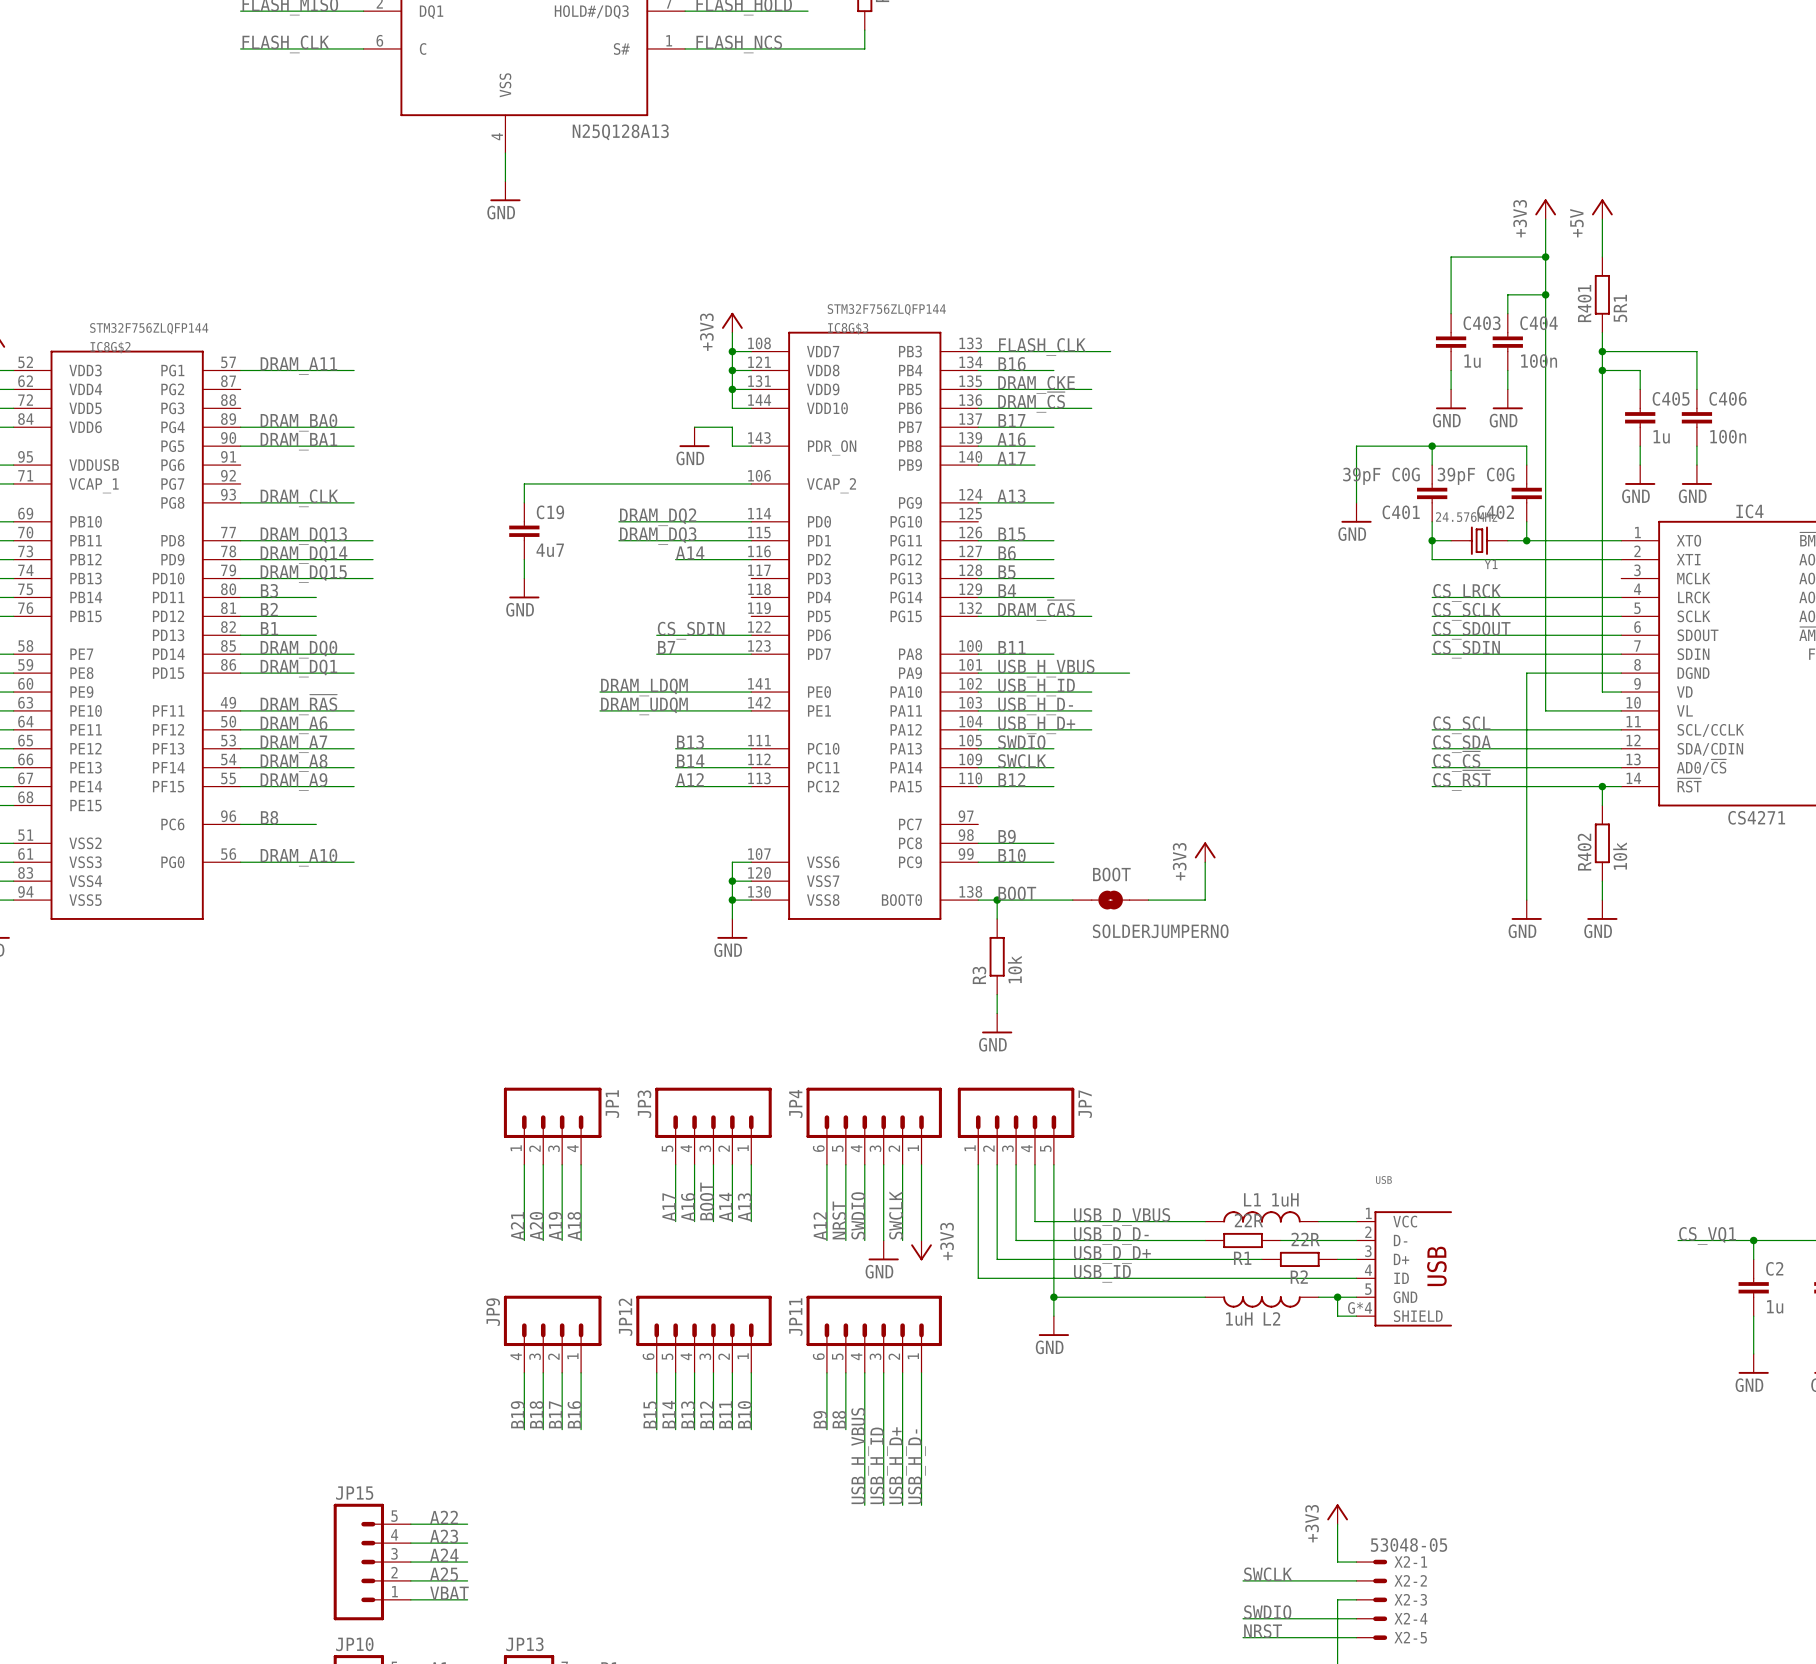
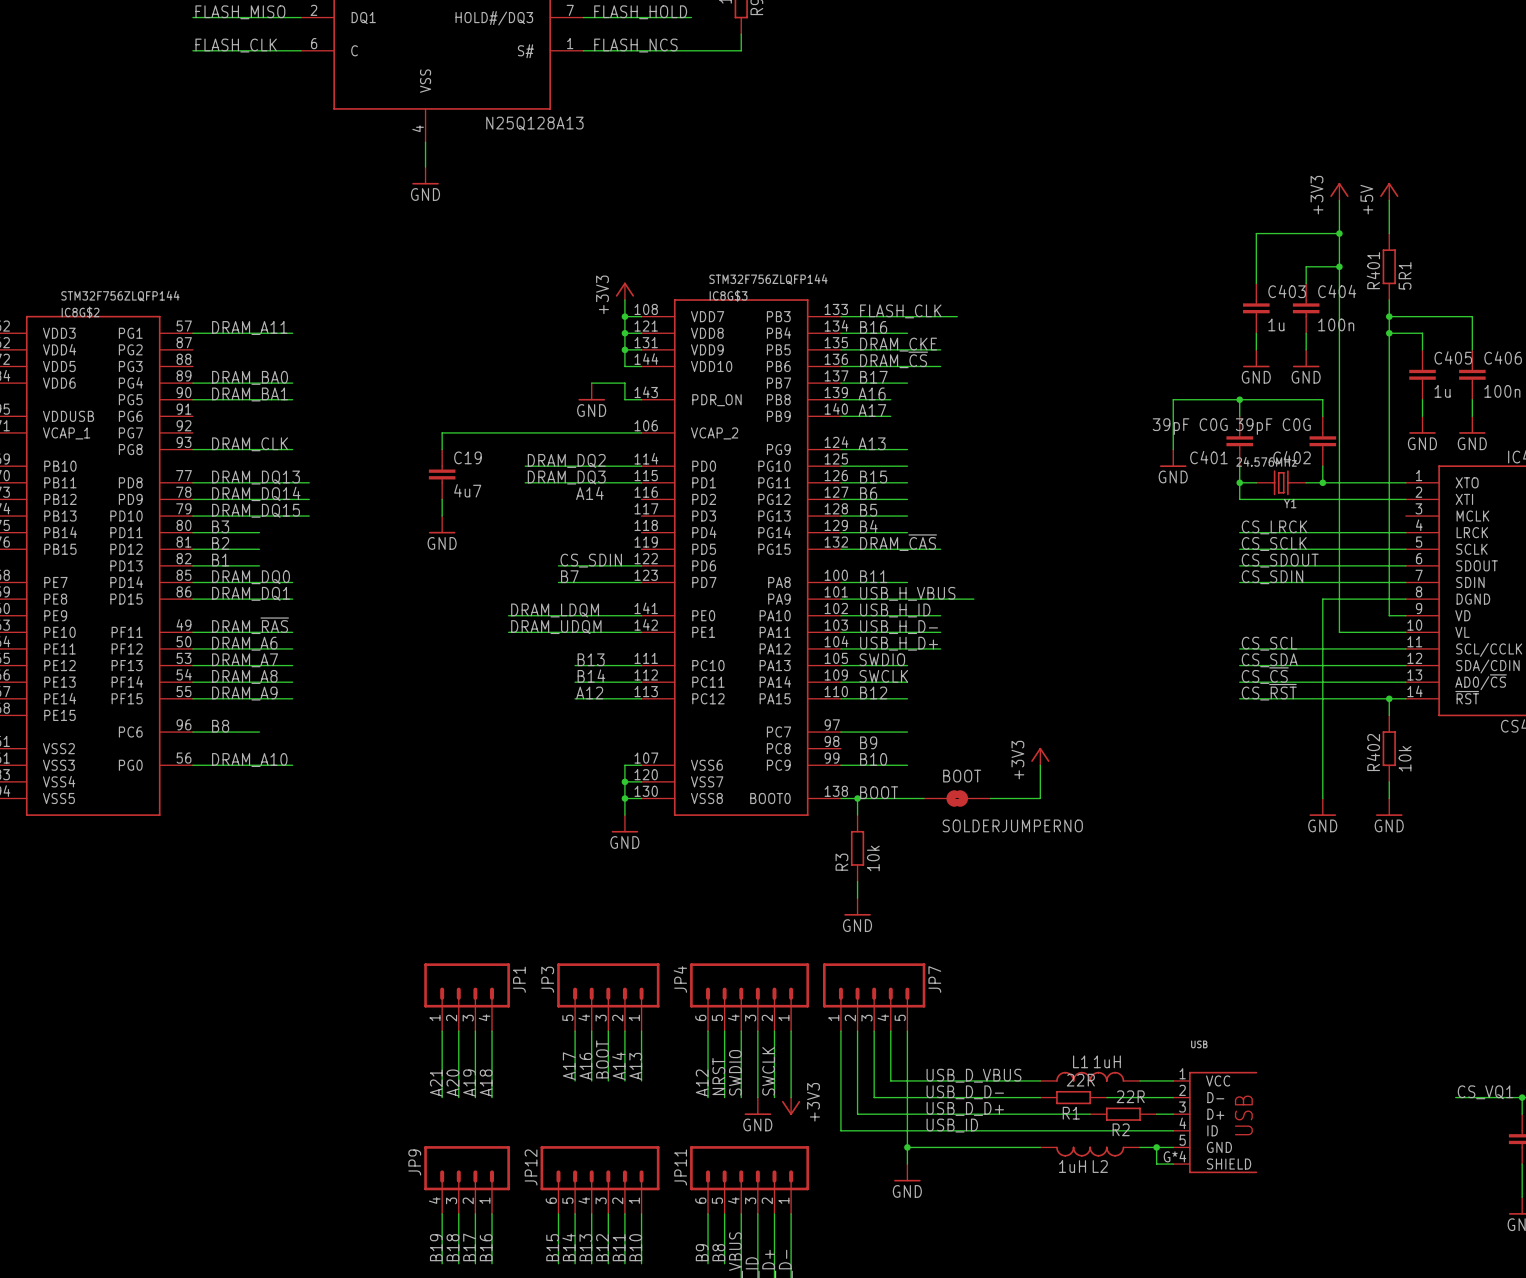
wire: none -> (840, 466) (907, 466)
wire: (675, 559) (751, 559) -> none
wire: (978, 843) (1053, 843) -> (840, 732) (907, 732)

